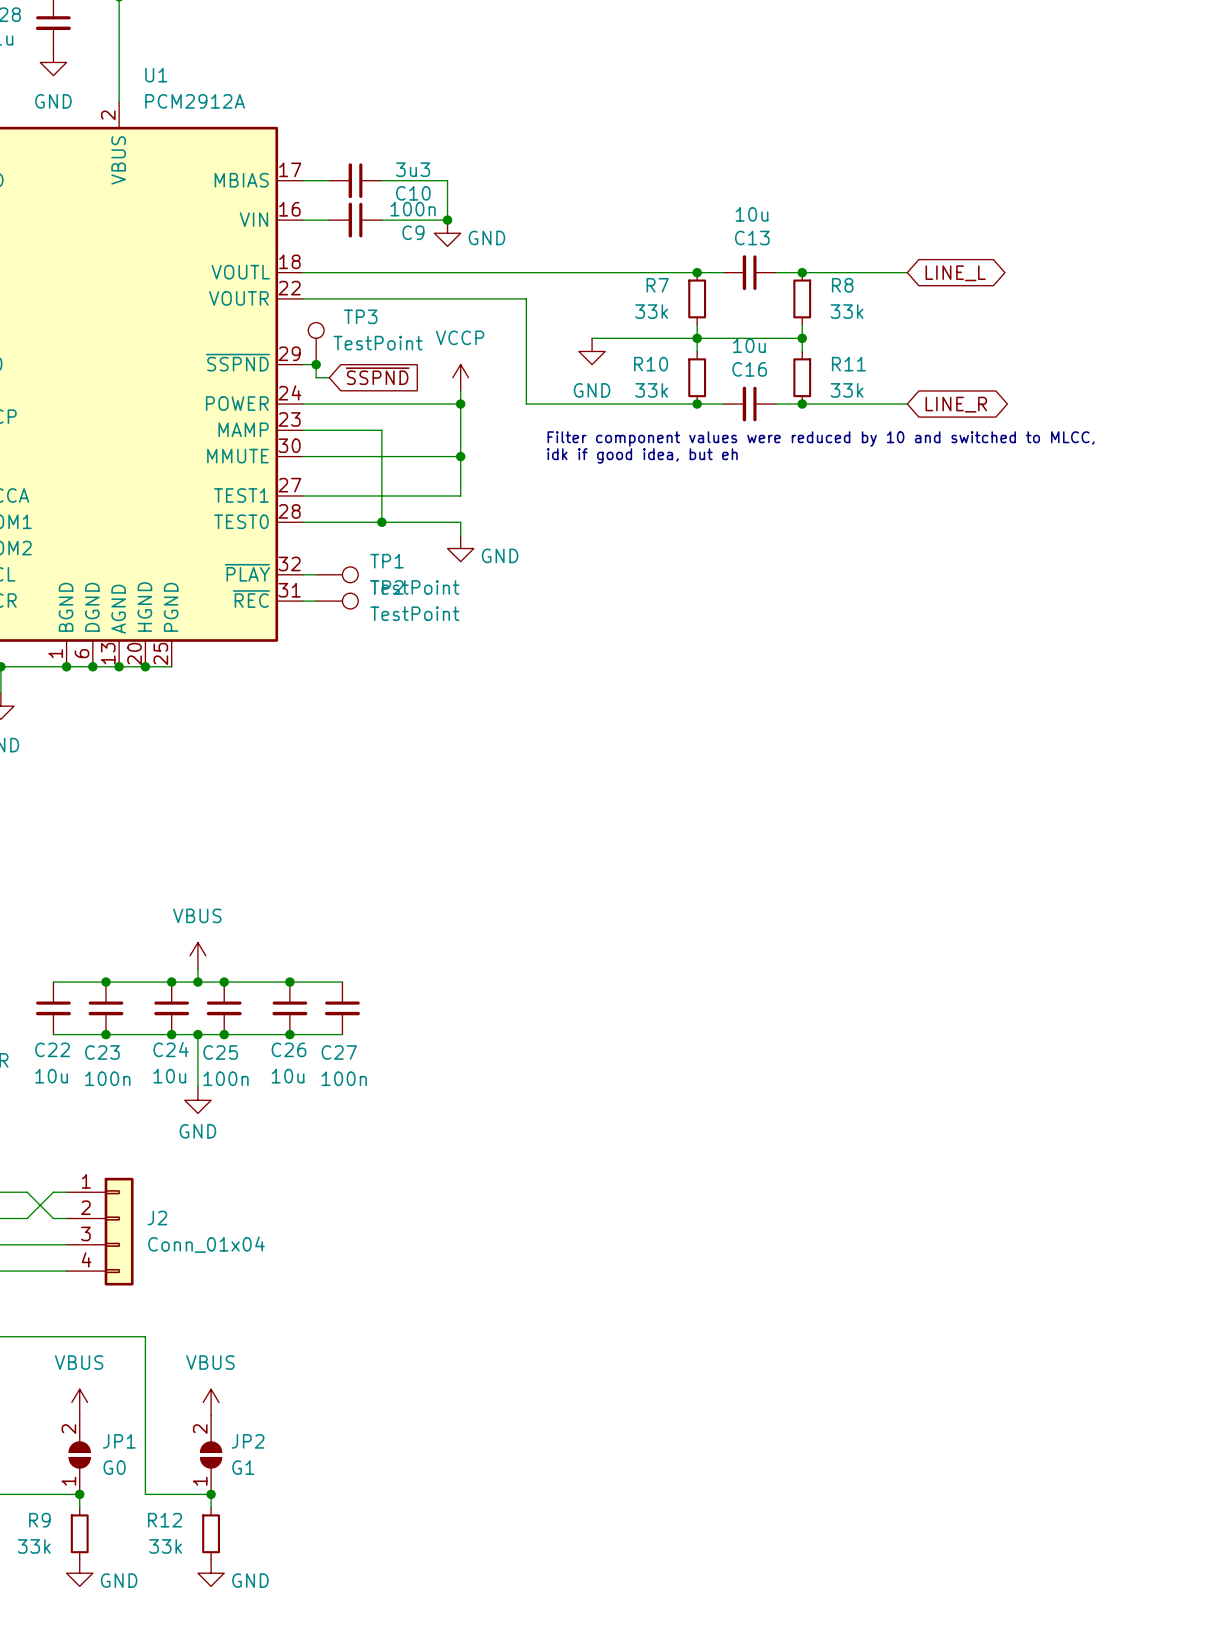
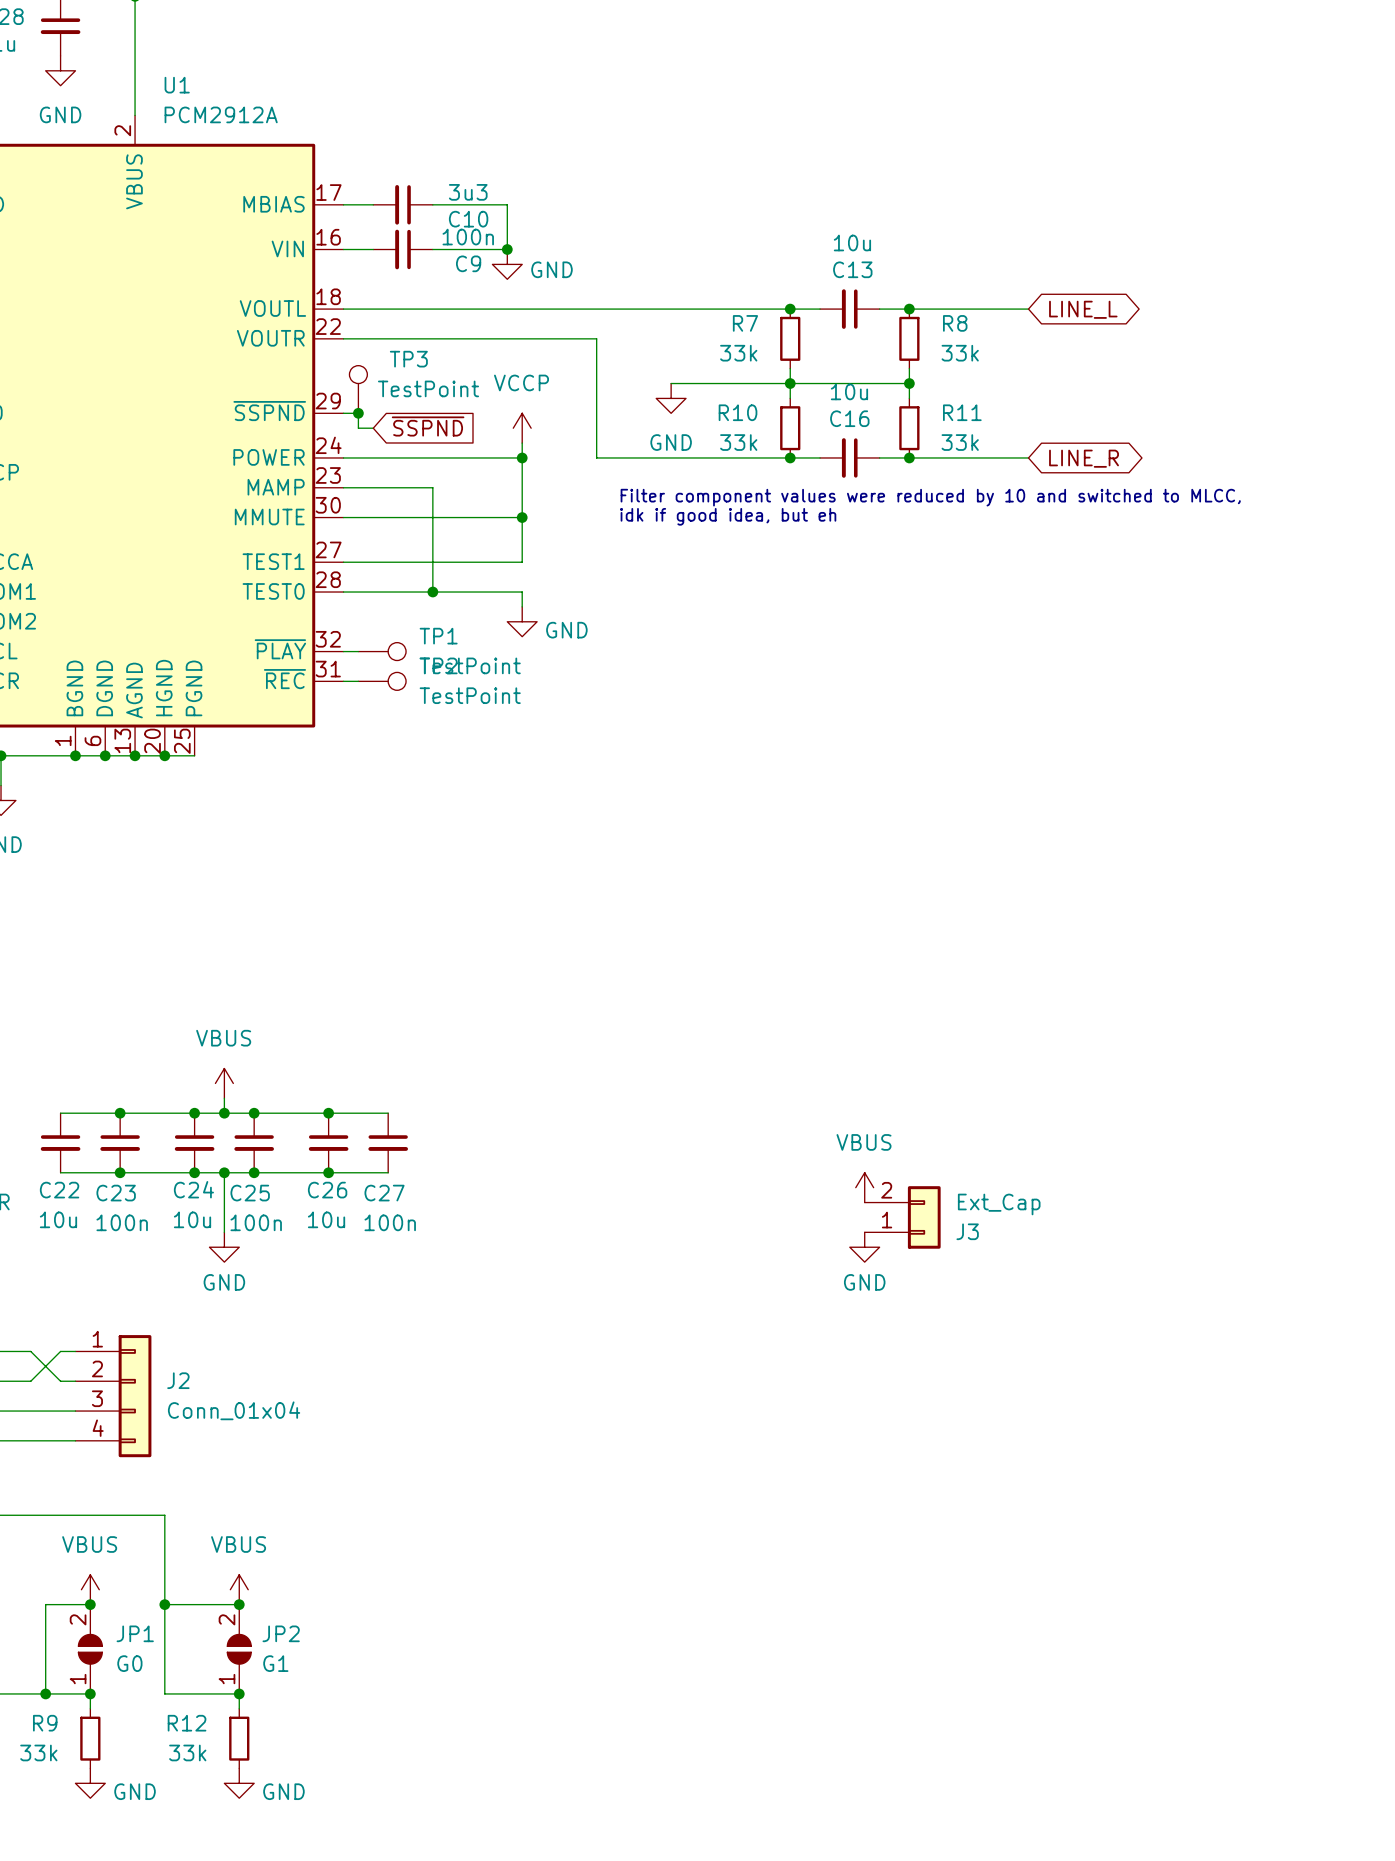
power symbol: none -> VBUS (864, 1187)
J3: none -> Ext_Cap (902, 1217)
power symbol: none -> GND (864, 1247)
wire: none -> (90, 1604) (45, 1604) (45, 1693)
junction: none -> (90, 1604)
wire: none -> (164, 1604) (239, 1604)
junction: none -> (164, 1604)
junction: none -> (239, 1604)
junction: none -> (45, 1693)

